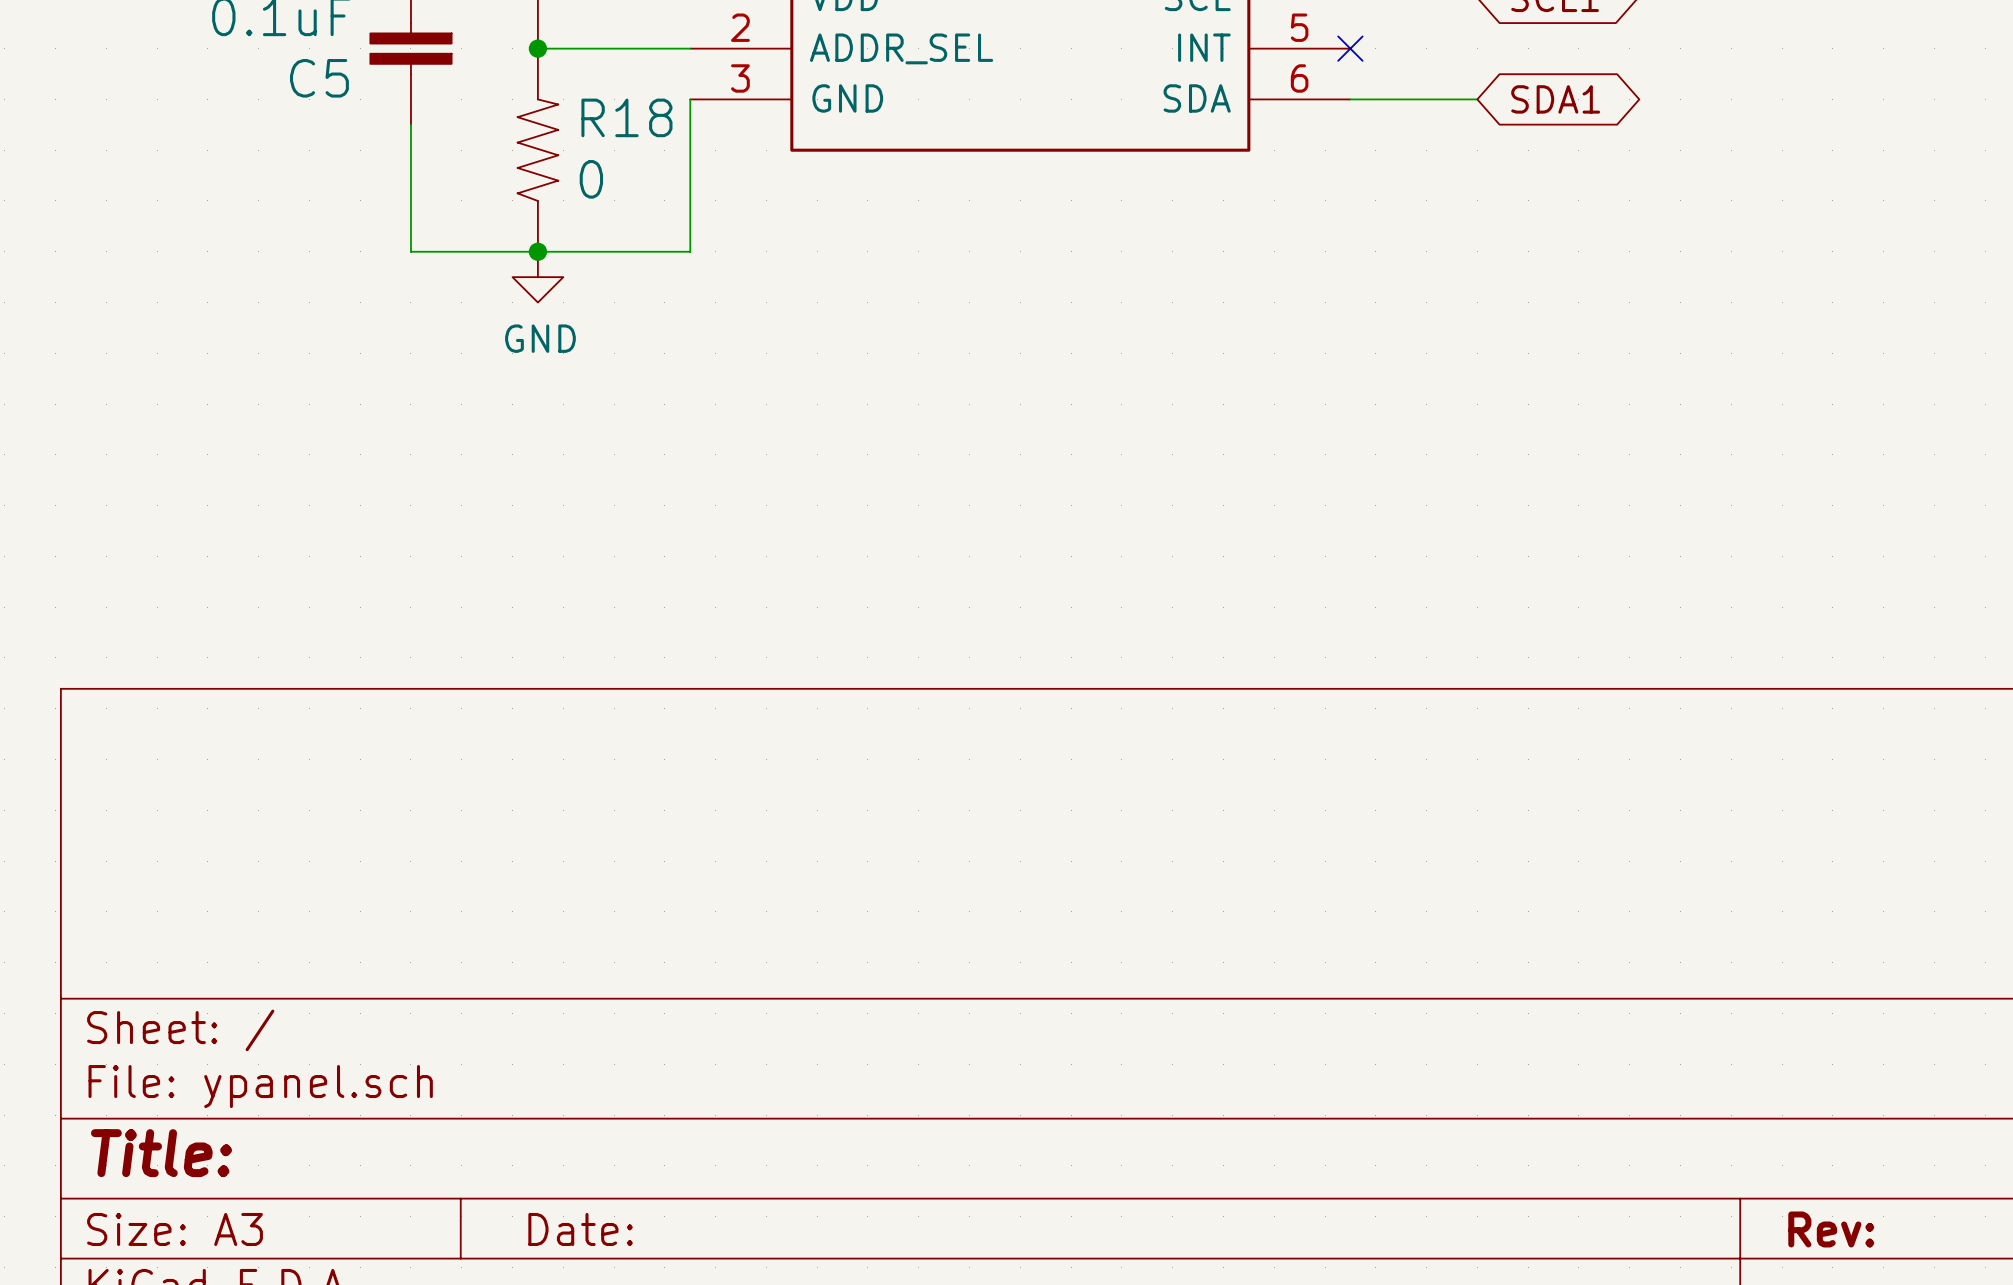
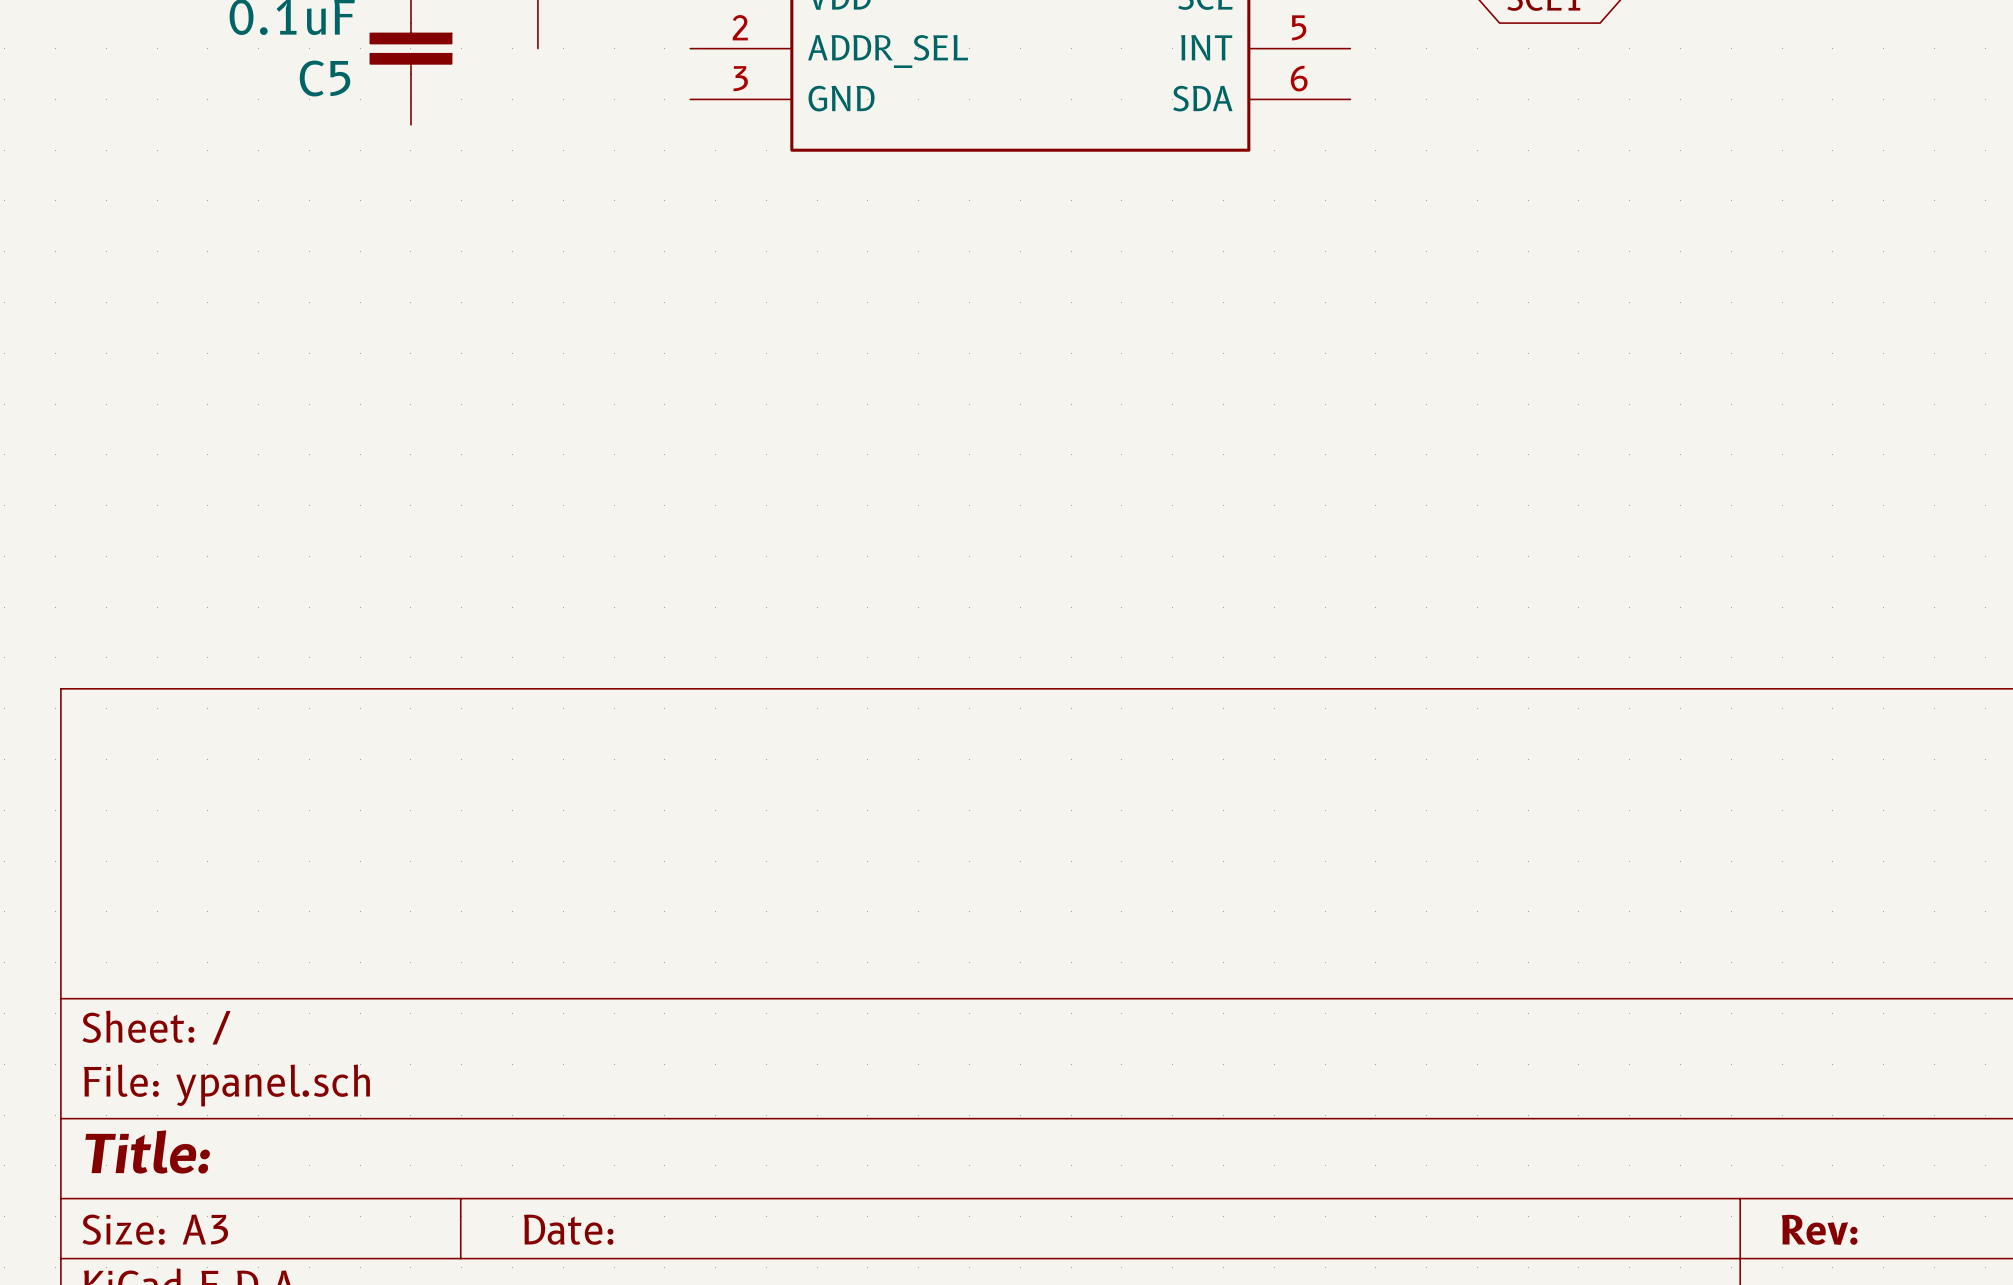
wire: (537, 48) (690, 48) -> none
junction: (537, 48) -> none
no-connect mark: (1350, 48) -> none
wire: (690, 99) (690, 251) (410, 251) (410, 124) -> none
wire: (1350, 99) (1477, 99) -> none
global label: SDA1 (1555, 99) -> none
R18: 0 (537, 150) -> none
junction: (537, 251) -> none
power symbol: GND (537, 277) -> none

